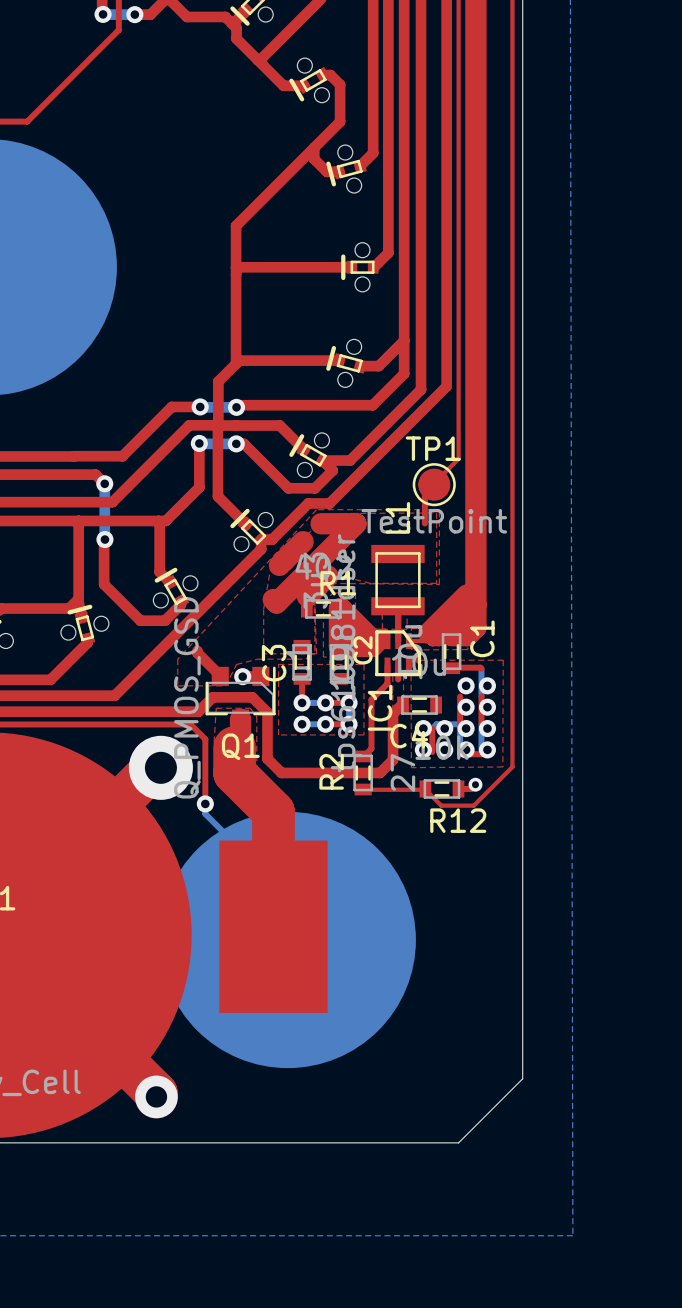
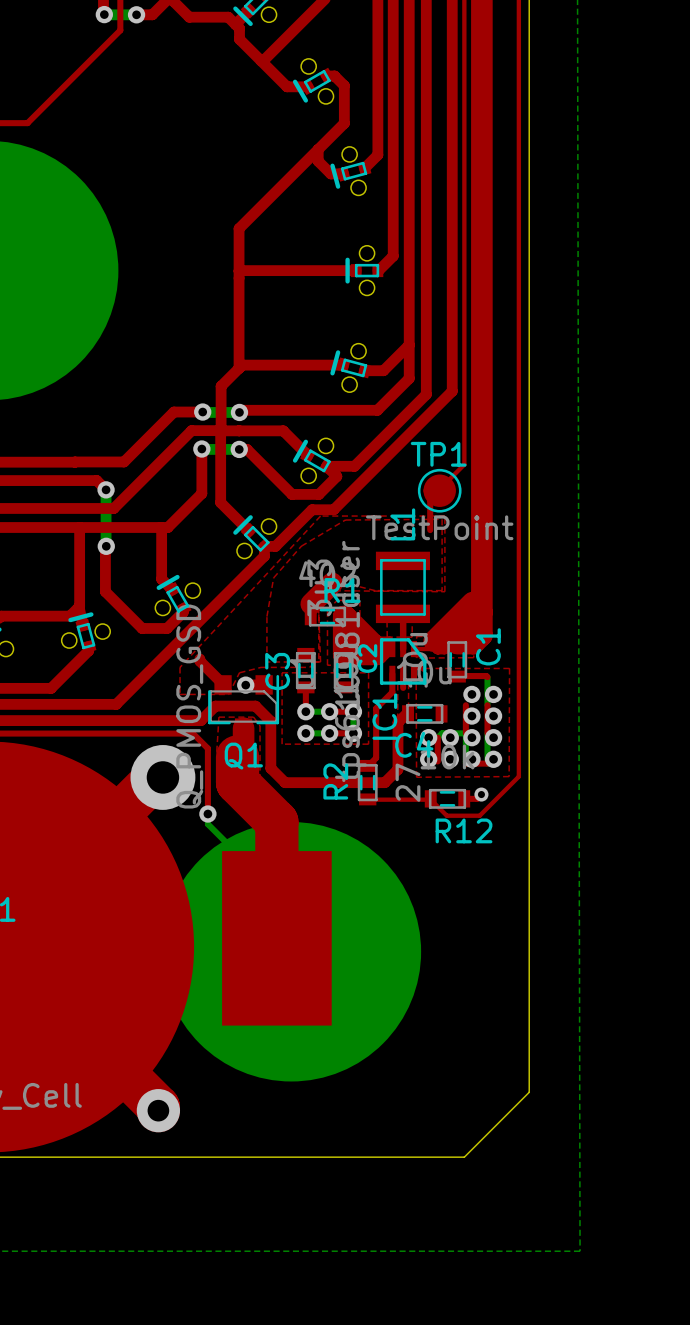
top track: (321, 523) (355, 523) (276, 602) (273, 599) -> none
top track: (303, 541) (279, 565) -> none

